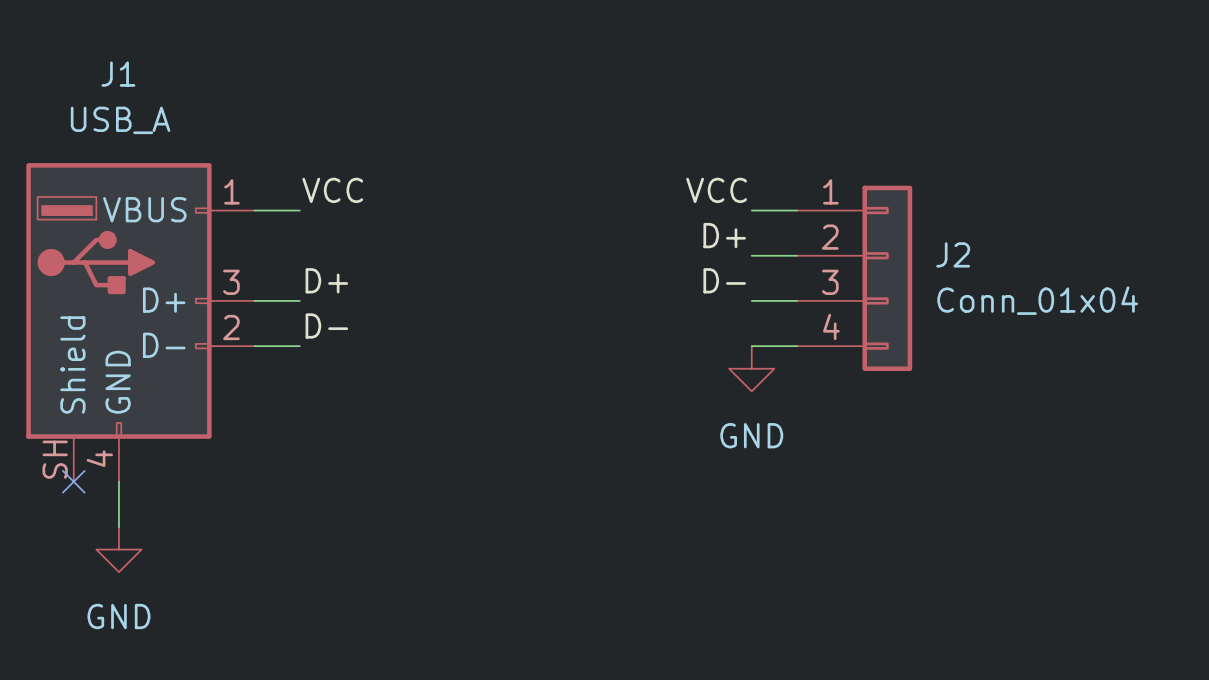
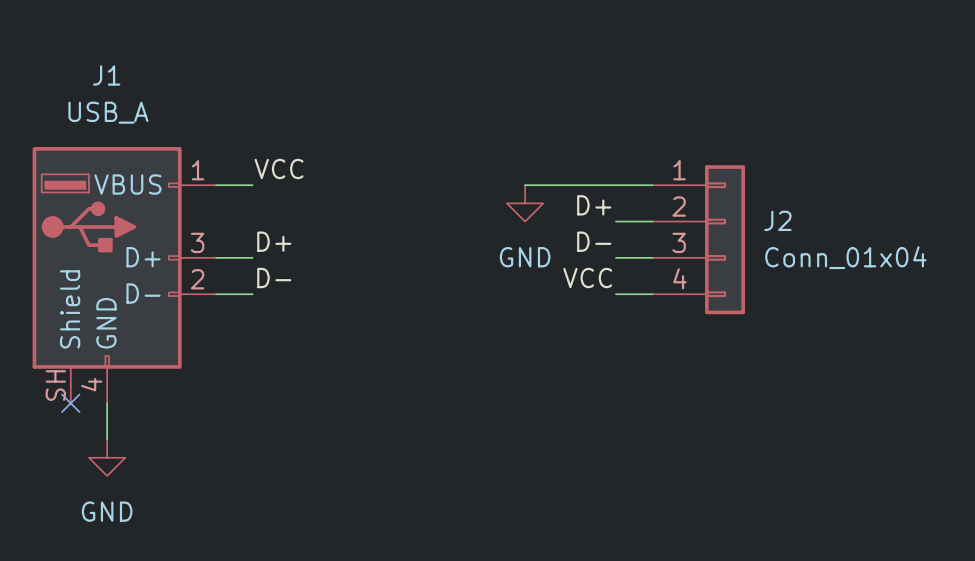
label position: VCC (716, 190) -> VCC (587, 278)
wire: none -> (525, 185) (615, 185)
power symbol position: GND (751, 368) -> GND (525, 203)

